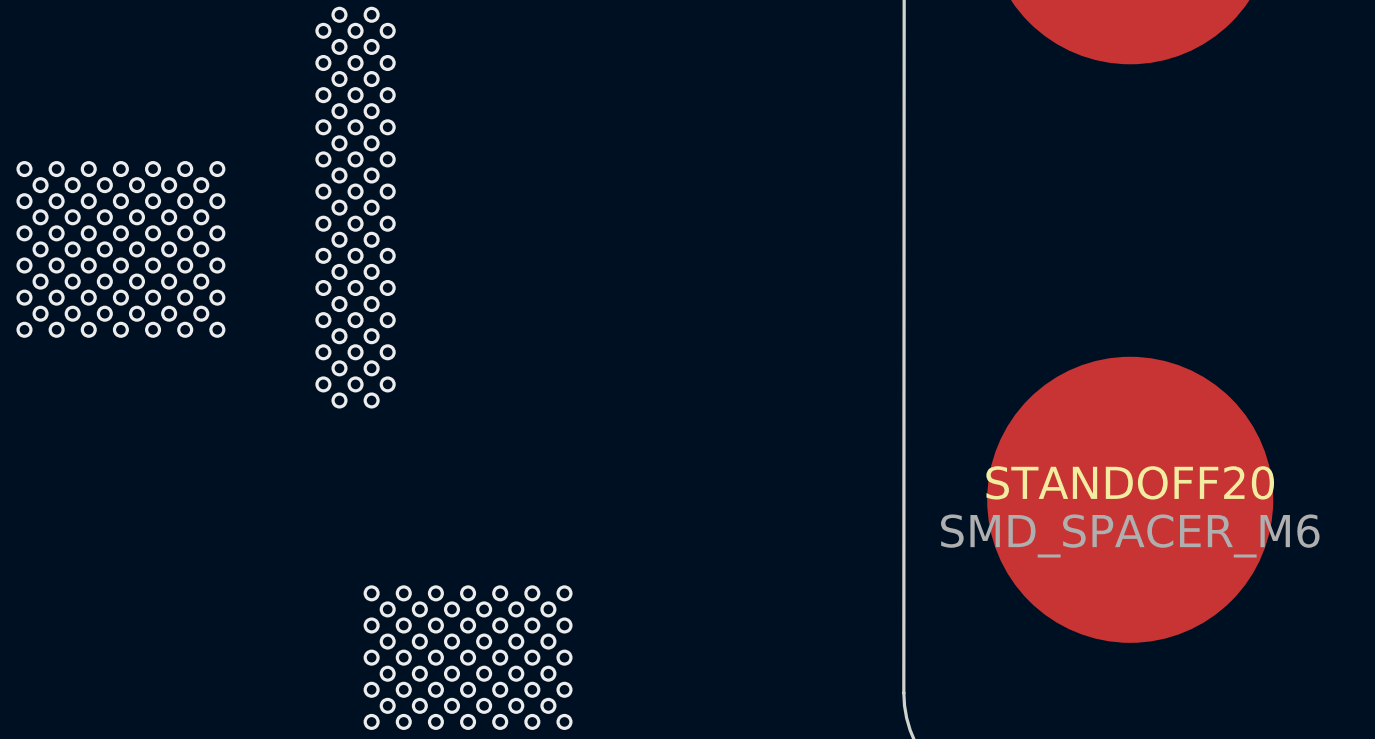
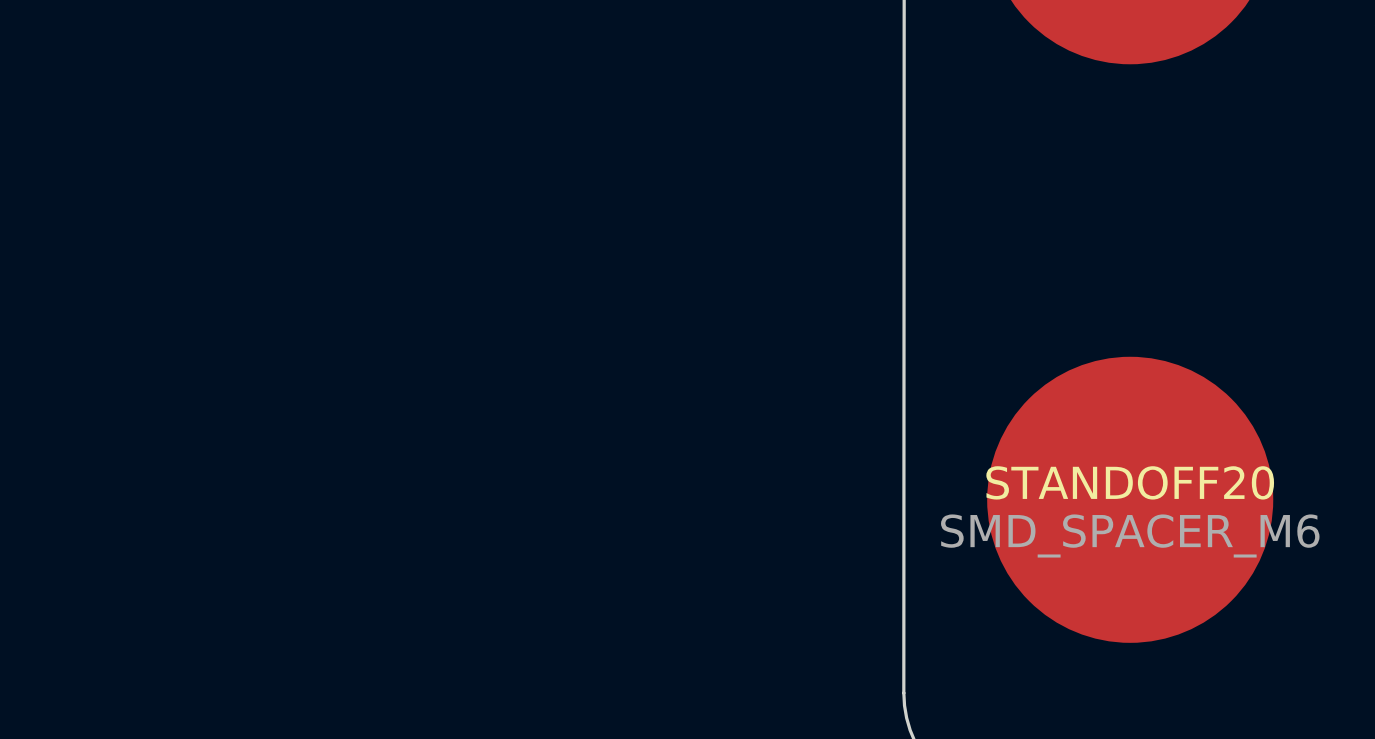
via: (339, 14) -> none
via: (371, 14) -> none
via: (323, 30) -> none
via: (355, 30) -> none
via: (387, 30) -> none
via: (339, 46) -> none
via: (371, 46) -> none
via: (323, 62) -> none
via: (355, 62) -> none
via: (387, 62) -> none
via: (339, 79) -> none
via: (371, 79) -> none
via: (323, 95) -> none
via: (355, 95) -> none
via: (387, 95) -> none
via: (339, 111) -> none
via: (371, 111) -> none
via: (323, 127) -> none
via: (355, 127) -> none
via: (387, 127) -> none
via: (339, 143) -> none
via: (371, 143) -> none
via: (323, 159) -> none
via: (355, 159) -> none
via: (387, 159) -> none
via: (24, 169) -> none
via: (56, 169) -> none
via: (88, 169) -> none
via: (120, 169) -> none
via: (153, 169) -> none
via: (185, 169) -> none
via: (217, 169) -> none
via: (339, 175) -> none
via: (371, 175) -> none
via: (40, 185) -> none
via: (72, 185) -> none
via: (104, 185) -> none
via: (136, 185) -> none
via: (169, 185) -> none
via: (201, 185) -> none
via: (323, 191) -> none
via: (355, 191) -> none
via: (387, 191) -> none
via: (24, 201) -> none
via: (56, 201) -> none
via: (88, 201) -> none
via: (120, 201) -> none
via: (153, 201) -> none
via: (185, 201) -> none
via: (217, 201) -> none
via: (339, 207) -> none
via: (371, 207) -> none
via: (40, 217) -> none
via: (72, 217) -> none
via: (104, 217) -> none
via: (136, 217) -> none
via: (169, 217) -> none
via: (201, 217) -> none
via: (323, 223) -> none
via: (355, 223) -> none
via: (387, 223) -> none
via: (24, 233) -> none
via: (56, 233) -> none
via: (88, 233) -> none
via: (120, 233) -> none
via: (153, 233) -> none
via: (185, 233) -> none
via: (217, 233) -> none
via: (339, 239) -> none
via: (371, 239) -> none
via: (40, 249) -> none
via: (72, 249) -> none
via: (104, 249) -> none
via: (136, 249) -> none
via: (169, 249) -> none
via: (201, 249) -> none
via: (323, 255) -> none
via: (355, 255) -> none
via: (387, 255) -> none
via: (24, 265) -> none
via: (56, 265) -> none
via: (88, 265) -> none
via: (120, 265) -> none
via: (153, 265) -> none
via: (185, 265) -> none
via: (217, 265) -> none
via: (339, 271) -> none
via: (371, 271) -> none
via: (40, 281) -> none
via: (72, 281) -> none
via: (104, 281) -> none
via: (136, 281) -> none
via: (169, 281) -> none
via: (201, 281) -> none
via: (323, 287) -> none
via: (355, 287) -> none
via: (387, 287) -> none
via: (24, 297) -> none
via: (56, 297) -> none
via: (88, 297) -> none
via: (120, 297) -> none
via: (153, 297) -> none
via: (185, 297) -> none
via: (217, 297) -> none
via: (339, 304) -> none
via: (371, 304) -> none
via: (40, 313) -> none
via: (72, 313) -> none
via: (104, 313) -> none
via: (136, 313) -> none
via: (169, 313) -> none
via: (201, 313) -> none
via: (323, 320) -> none
via: (355, 320) -> none
via: (387, 320) -> none
via: (24, 329) -> none
via: (56, 329) -> none
via: (88, 329) -> none
via: (120, 329) -> none
via: (153, 329) -> none
via: (185, 329) -> none
via: (217, 329) -> none
via: (339, 336) -> none
via: (371, 336) -> none
via: (323, 352) -> none
via: (355, 352) -> none
via: (387, 352) -> none
via: (339, 368) -> none
via: (371, 368) -> none
via: (323, 384) -> none
via: (355, 384) -> none
via: (387, 384) -> none
via: (339, 400) -> none
via: (371, 400) -> none
via: (371, 593) -> none
via: (403, 593) -> none
via: (435, 593) -> none
via: (468, 593) -> none
via: (500, 593) -> none
via: (532, 593) -> none
via: (564, 593) -> none
via: (387, 609) -> none
via: (419, 609) -> none
via: (451, 609) -> none
via: (484, 609) -> none
via: (516, 609) -> none
via: (548, 609) -> none
via: (371, 625) -> none
via: (403, 625) -> none
via: (435, 625) -> none
via: (468, 625) -> none
via: (500, 625) -> none
via: (532, 625) -> none
via: (564, 625) -> none
via: (387, 641) -> none
via: (419, 641) -> none
via: (451, 641) -> none
via: (484, 641) -> none
via: (516, 641) -> none
via: (548, 641) -> none
via: (371, 657) -> none
via: (403, 657) -> none
via: (435, 657) -> none
via: (468, 657) -> none
via: (500, 657) -> none
via: (532, 657) -> none
via: (564, 657) -> none
via: (387, 673) -> none
via: (419, 673) -> none
via: (451, 673) -> none
via: (484, 673) -> none
via: (516, 673) -> none
via: (548, 673) -> none
via: (371, 689) -> none
via: (403, 689) -> none
via: (435, 689) -> none
via: (468, 689) -> none
via: (500, 689) -> none
via: (532, 689) -> none
via: (564, 689) -> none
via: (387, 705) -> none
via: (419, 705) -> none
via: (451, 705) -> none
via: (484, 705) -> none
via: (516, 705) -> none
via: (548, 705) -> none
via: (371, 721) -> none
via: (403, 721) -> none
via: (435, 721) -> none
via: (468, 721) -> none
via: (500, 721) -> none
via: (532, 721) -> none
via: (564, 721) -> none

